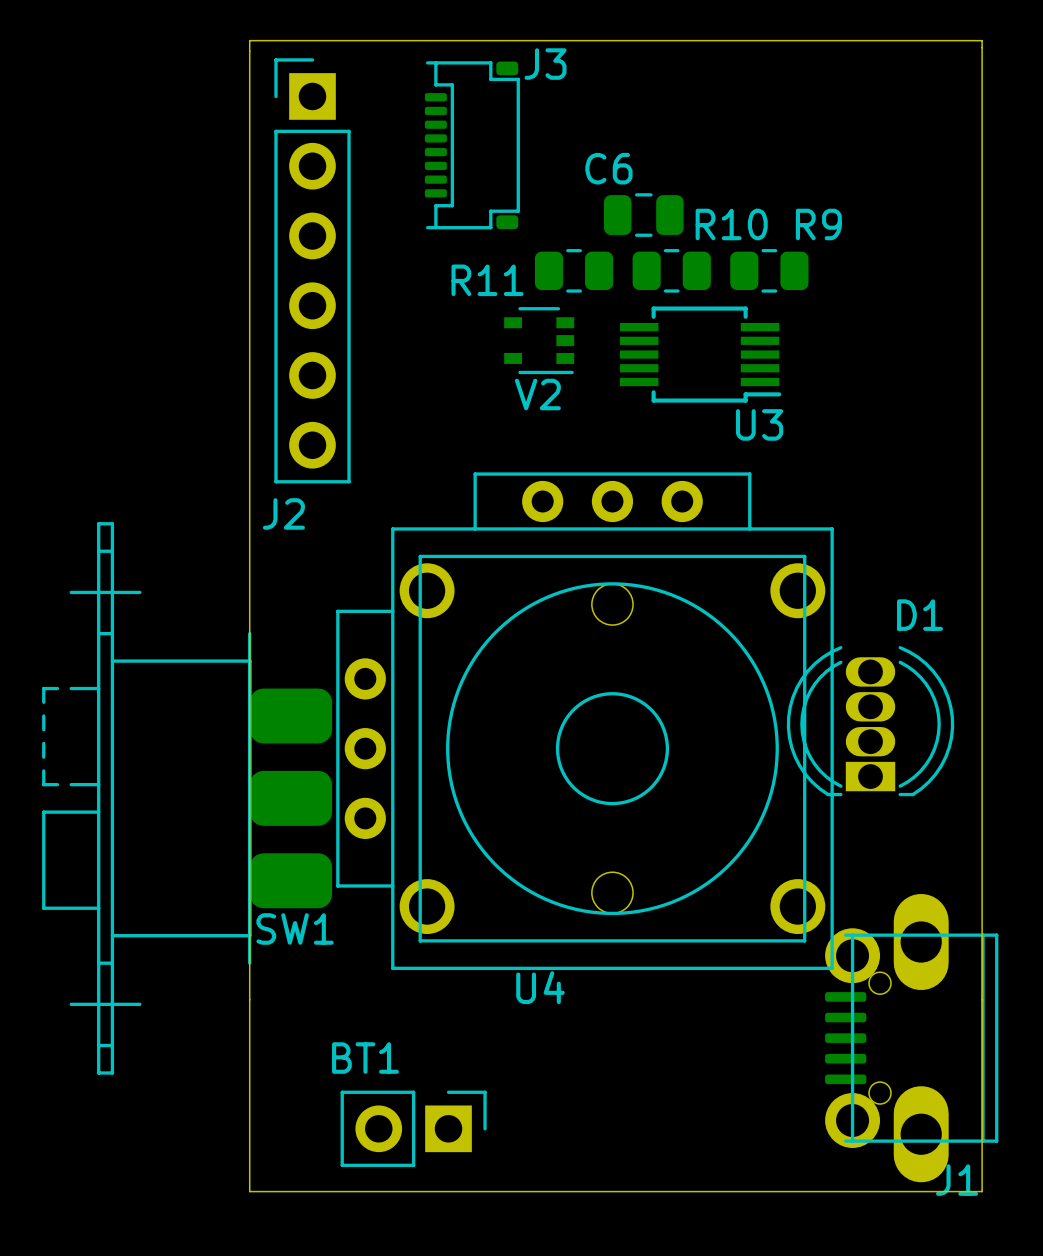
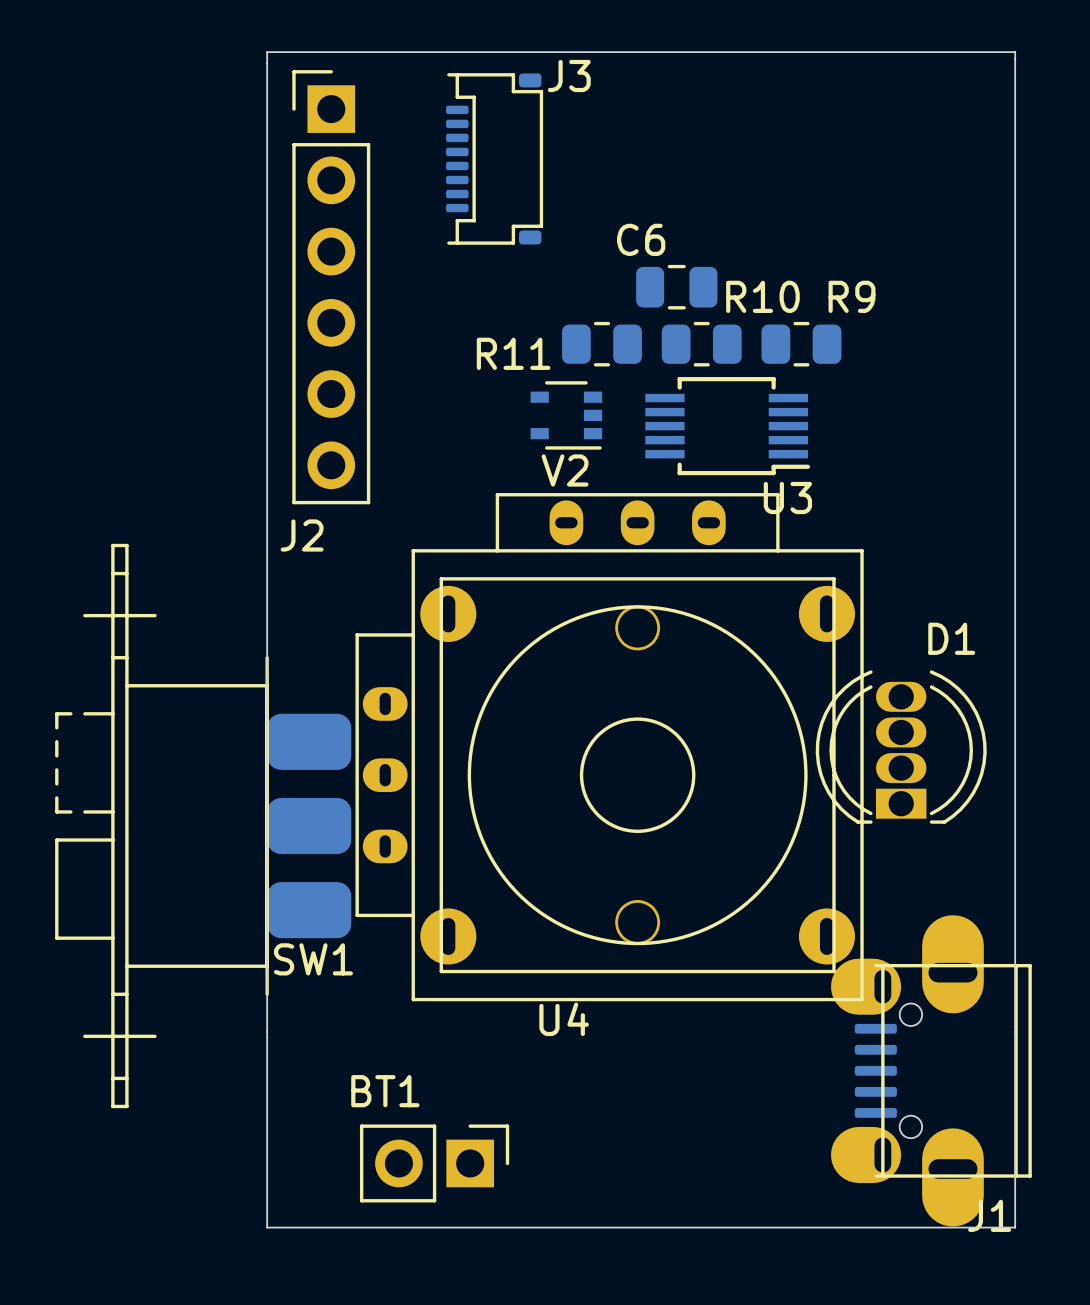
C6 position: (643, 215) -> (676, 287)
R11 position: (574, 270) -> (601, 344)
R10 position: (671, 270) -> (701, 344)
R9 position: (769, 270) -> (801, 344)
V2 position: (539, 340) -> (566, 415)
U3 position: (700, 354) -> (727, 426)
U4 footprint: [336, 472, 834, 970] -> [355, 493, 864, 1002]
J1 footprint: [825, 893, 999, 1183] -> [830, 915, 1032, 1227]

